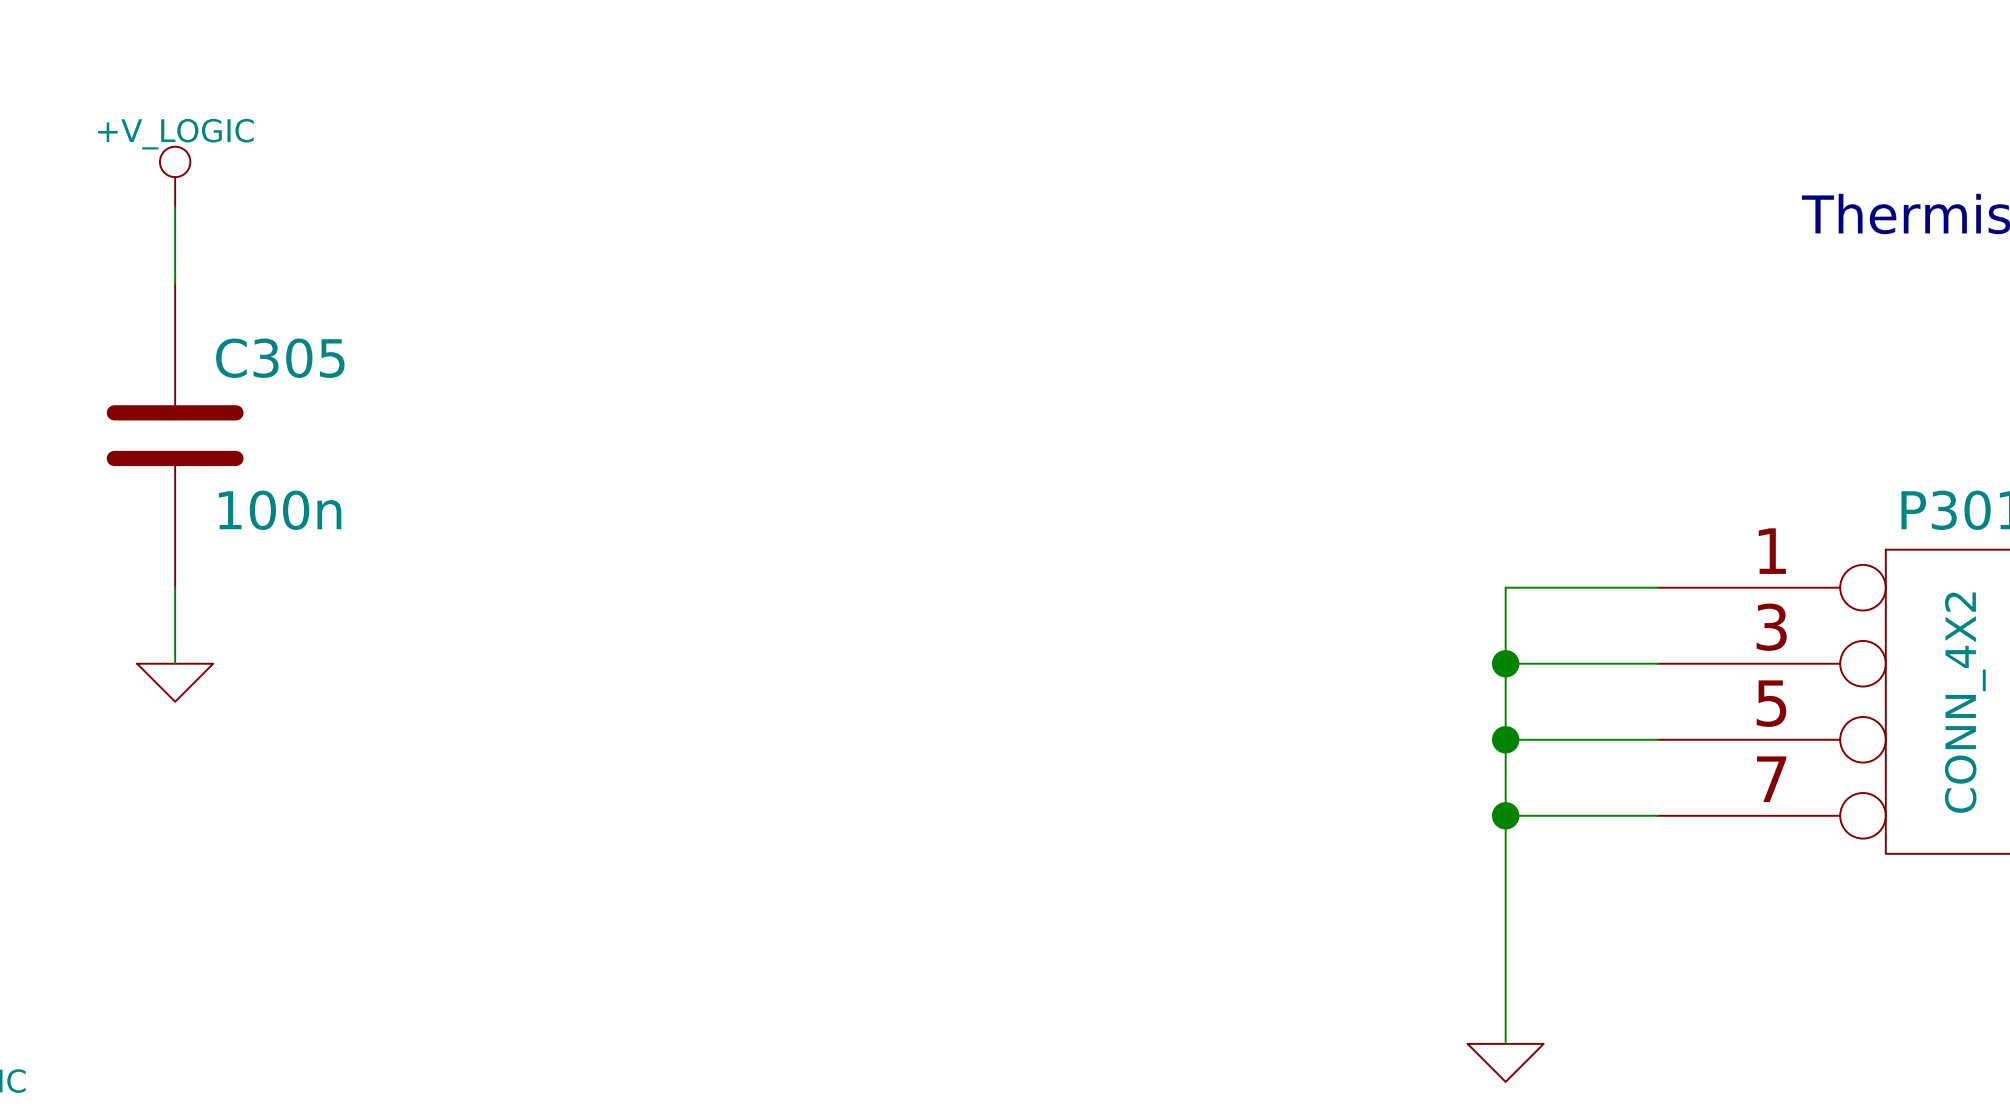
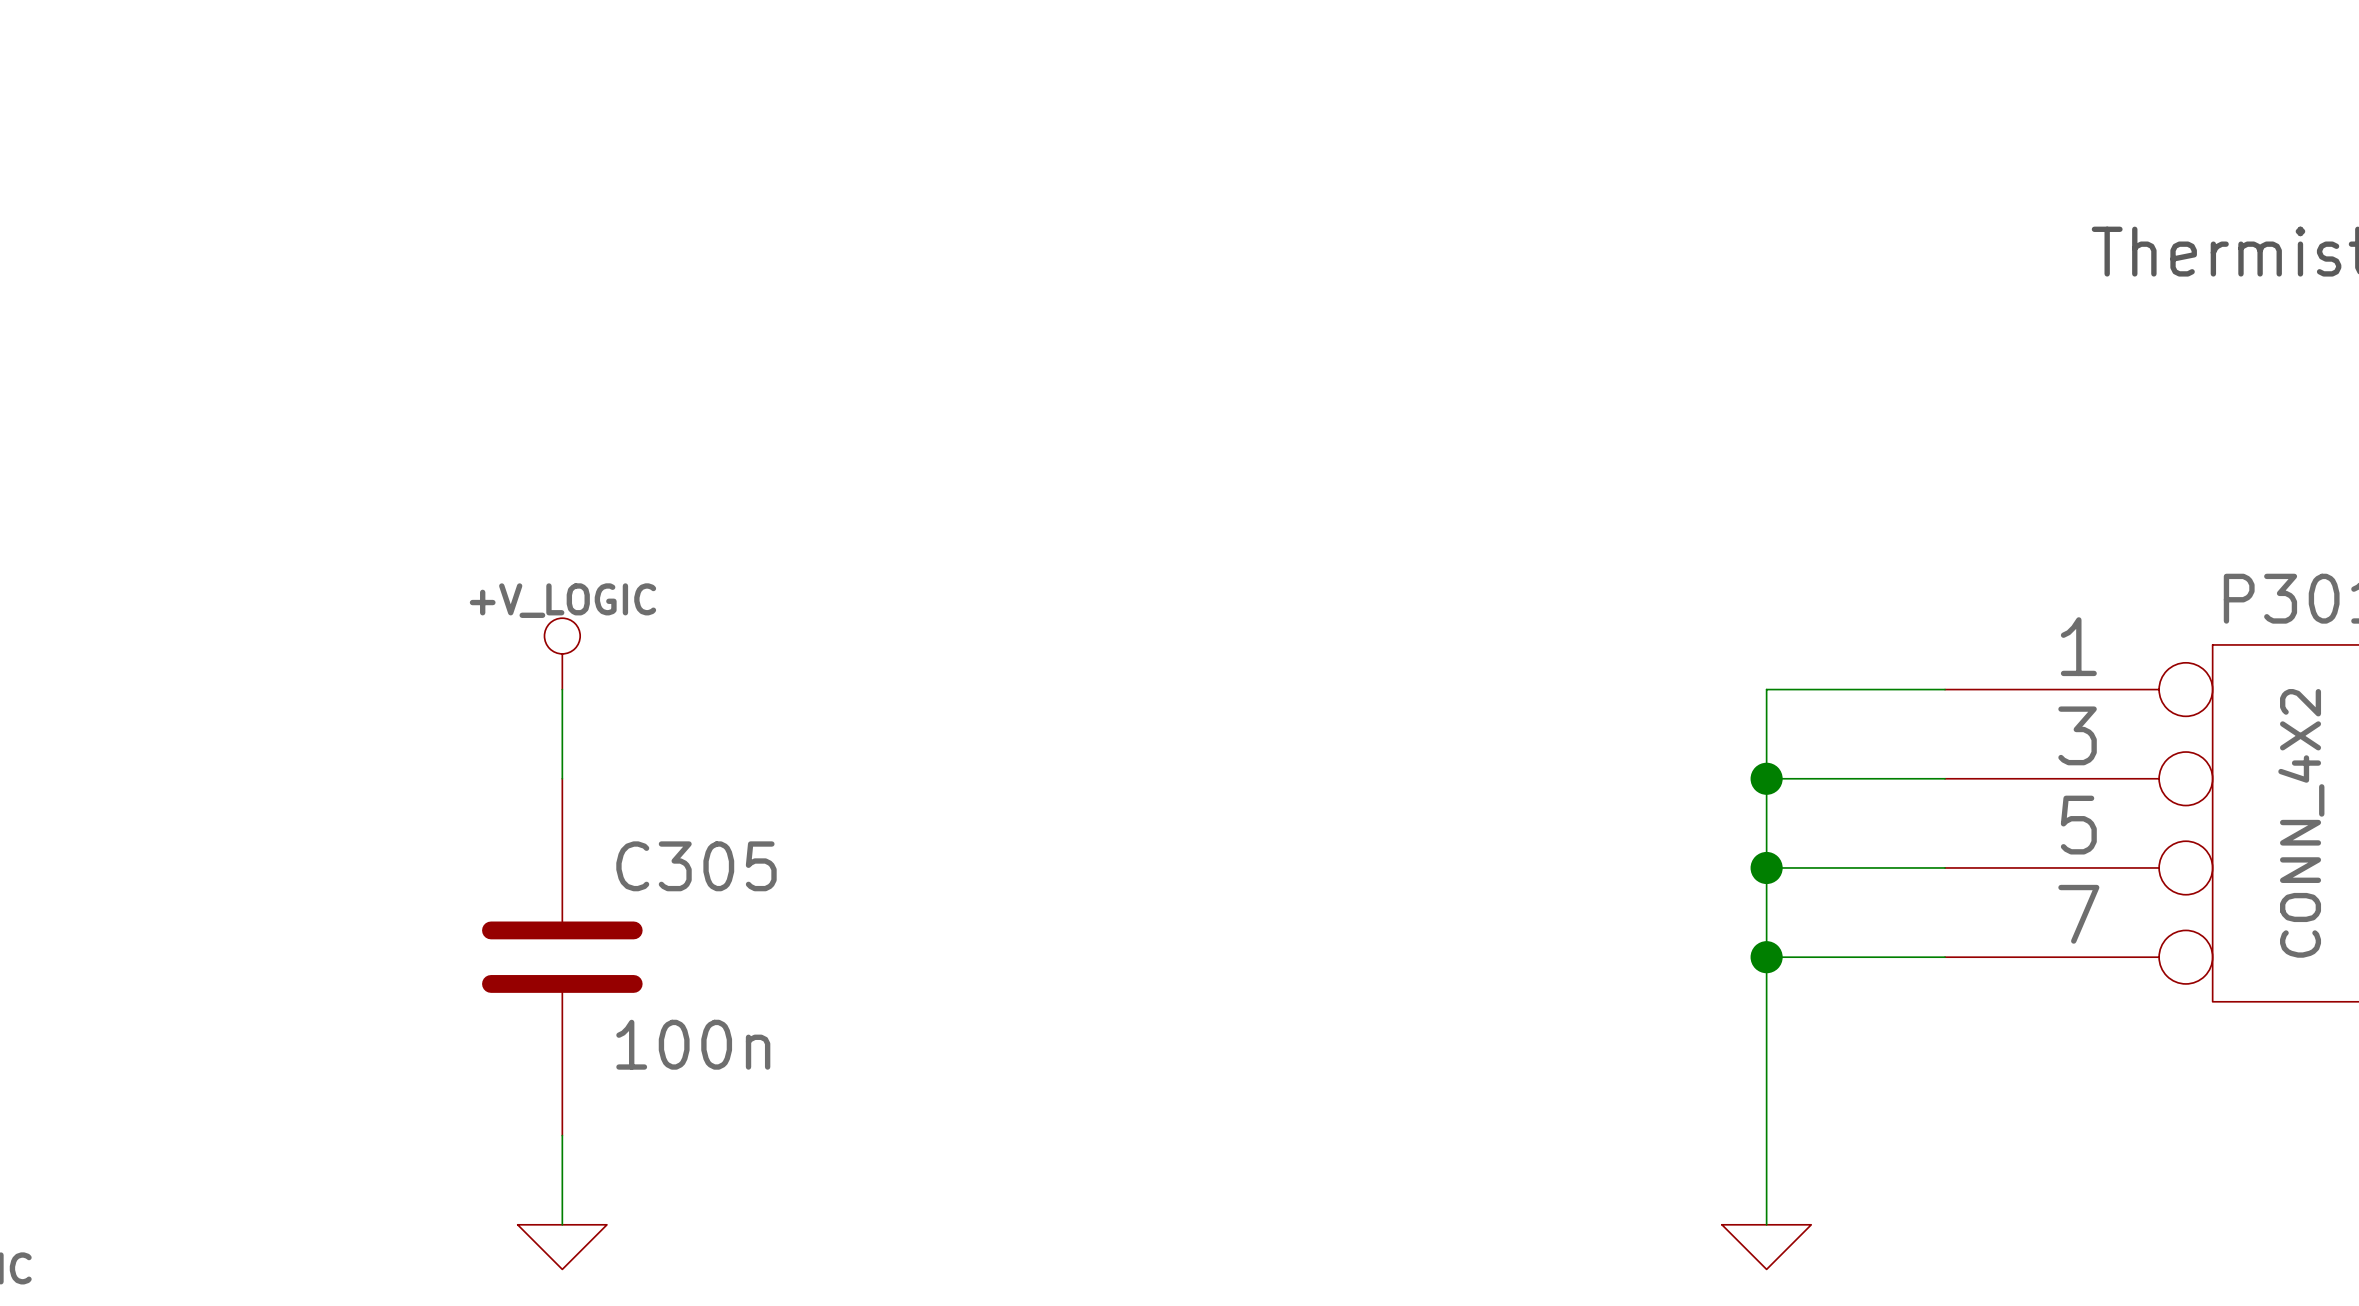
power symbol position: +V_LOGIC (175, 177) -> +V_LOGIC (562, 653)
wire: (175, 207) (175, 283) -> (562, 689) (562, 778)
C305 position: (175, 435) -> (562, 957)
wire: (175, 587) (175, 663) -> (562, 1135) (562, 1224)
power symbol position: (175, 682) -> (562, 1247)

